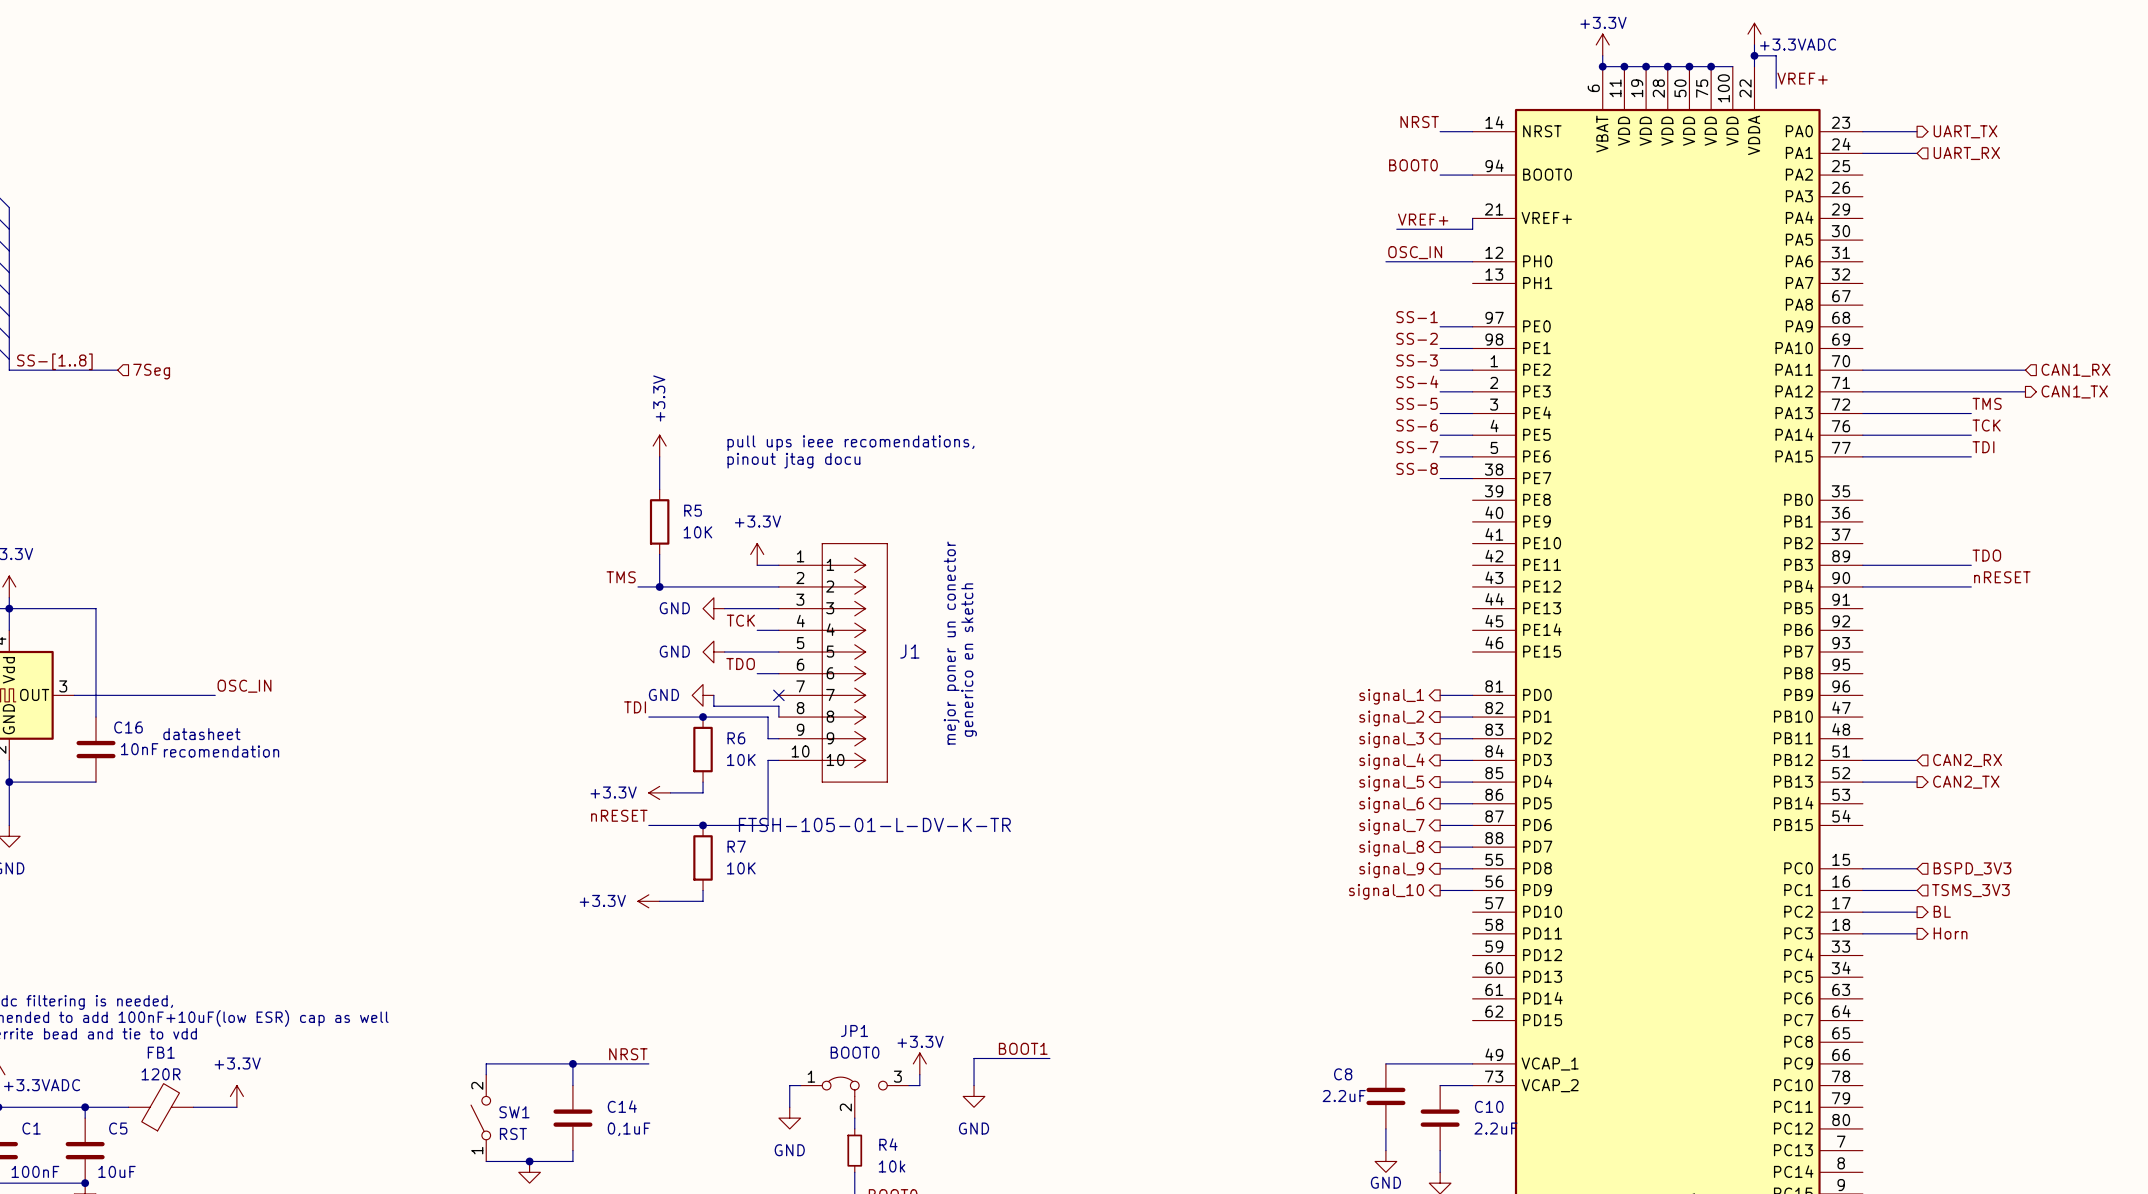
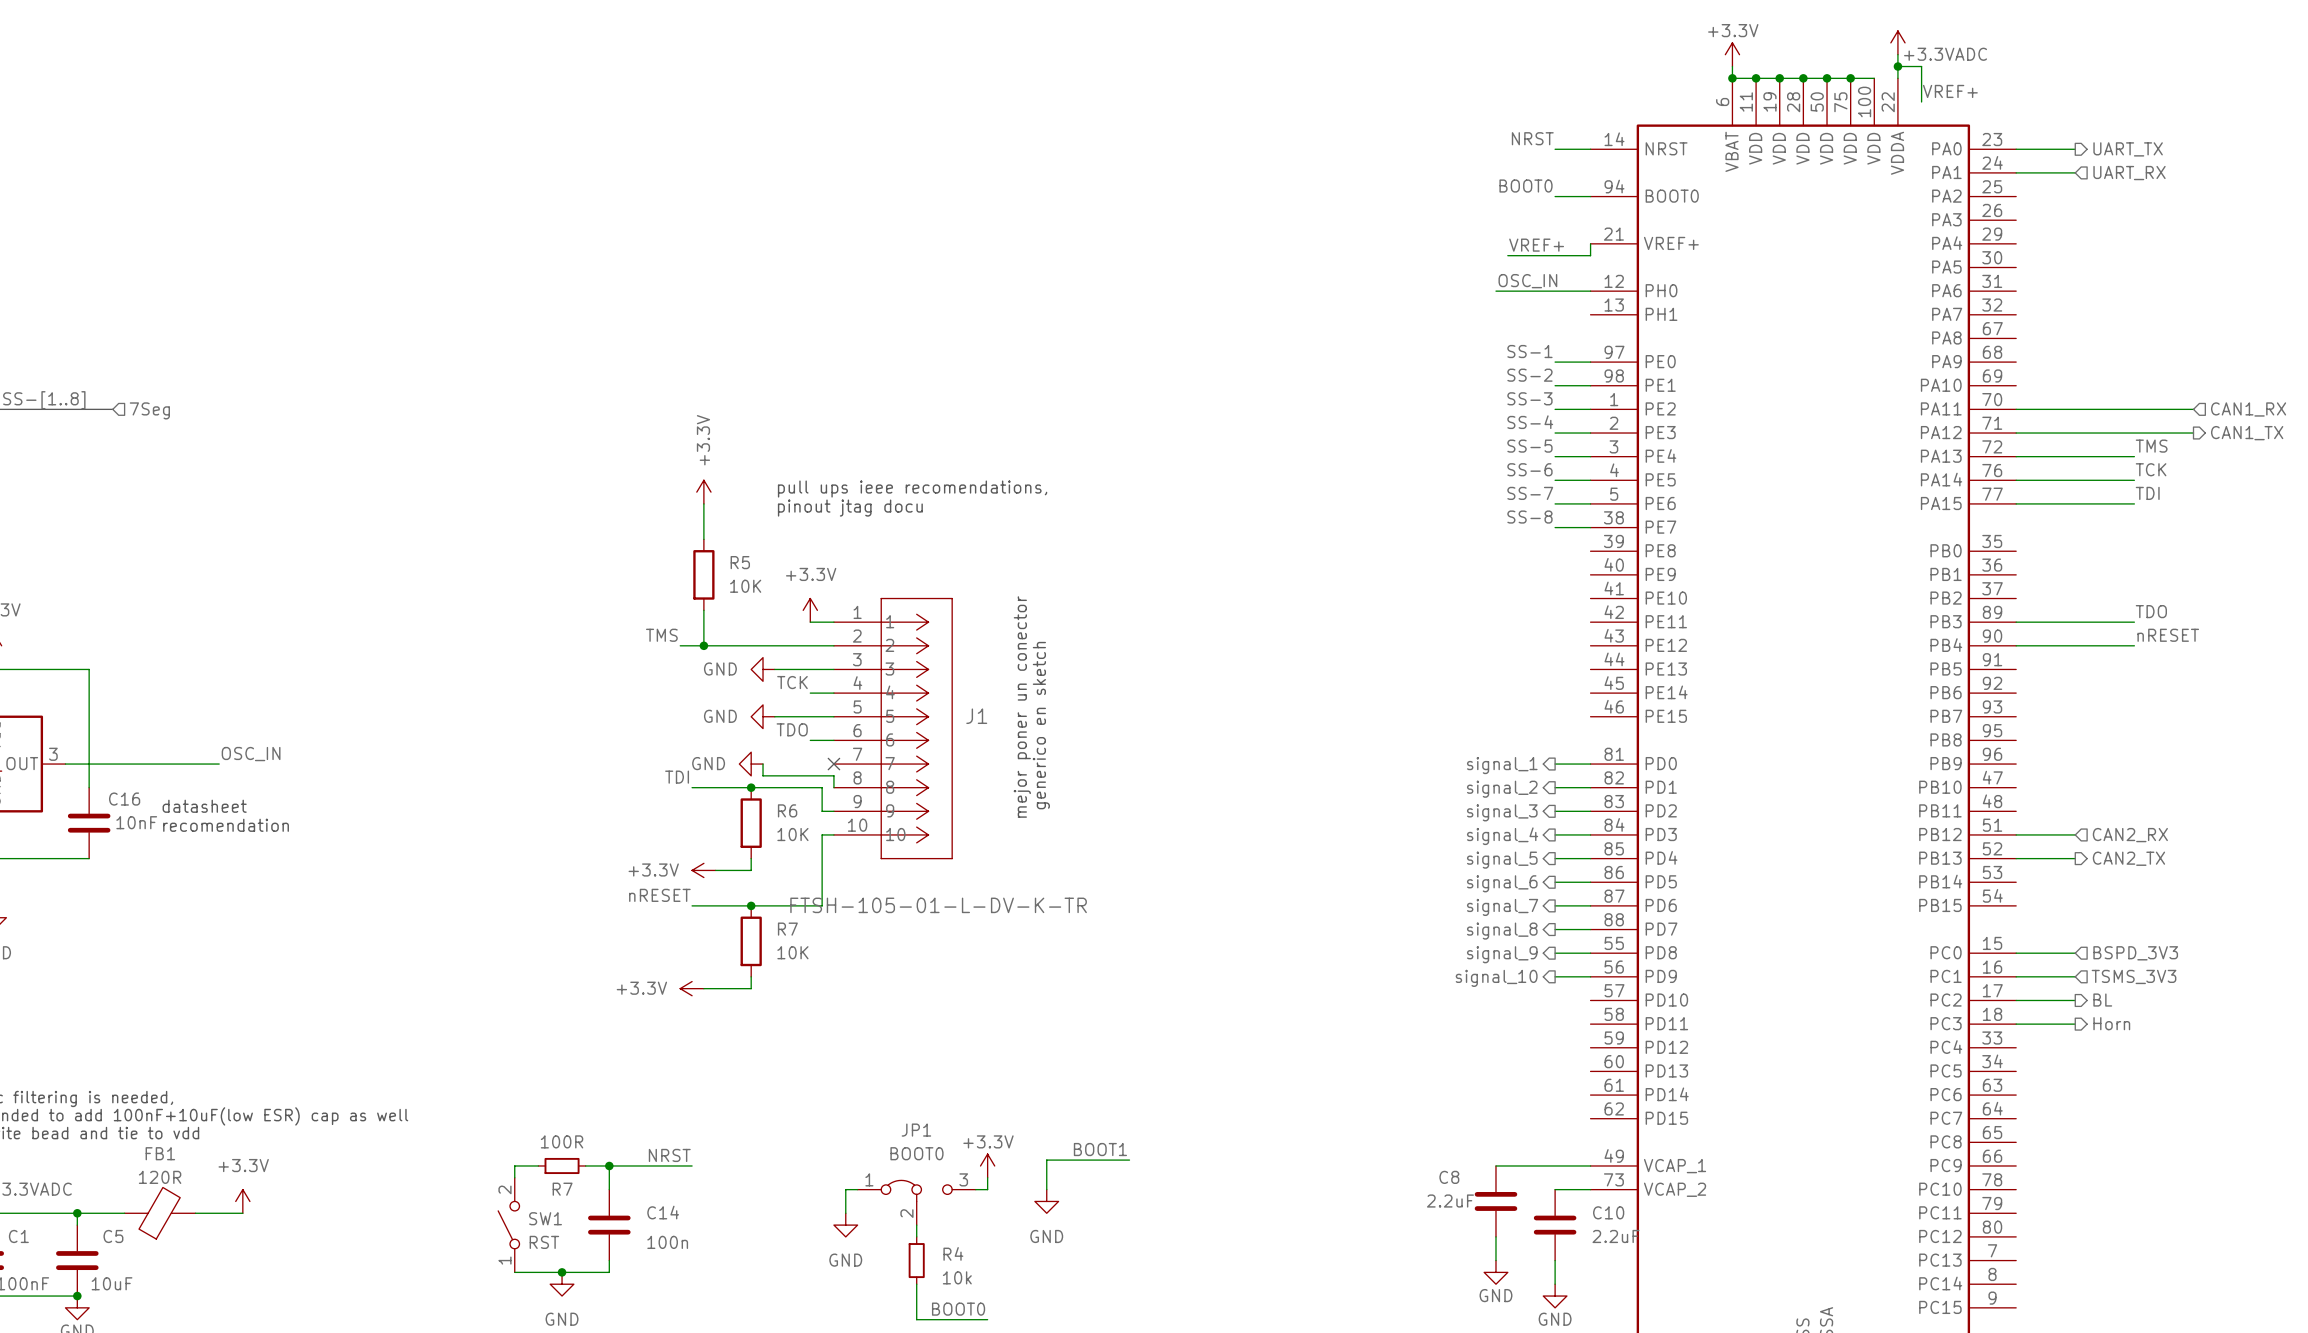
wire: (507, 1063) (551, 1063) -> none
R7: none -> 100R (562, 1165)
C14 value: 0,1uF (629, 1129) -> 100n (667, 1242)

